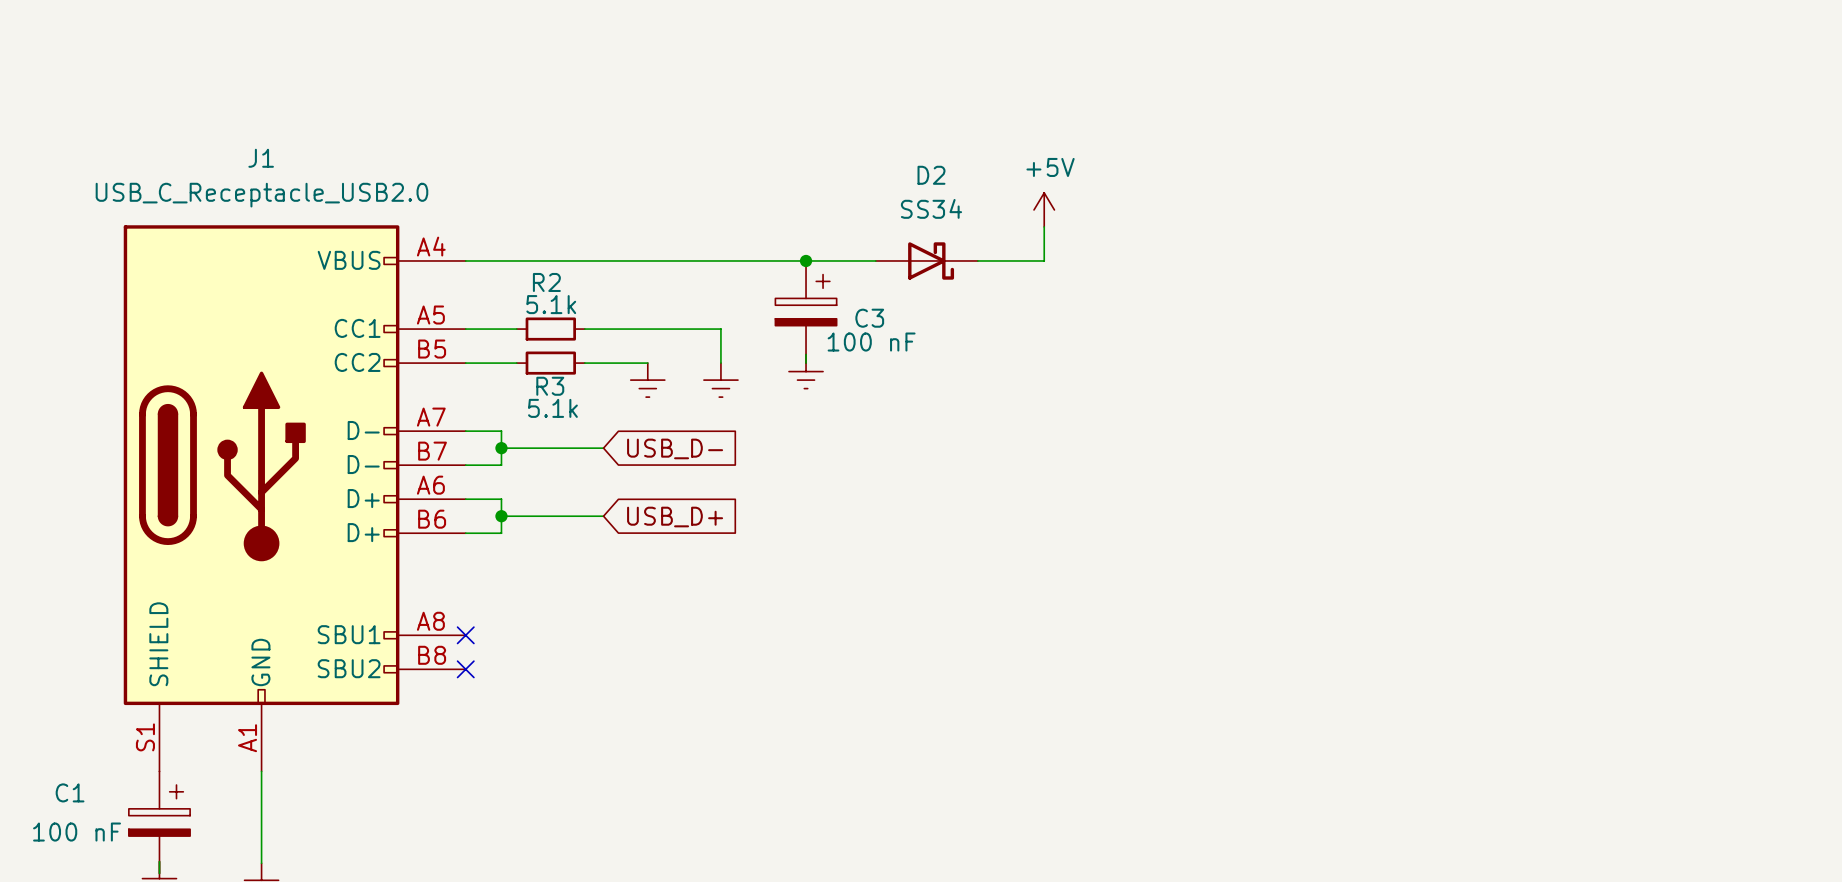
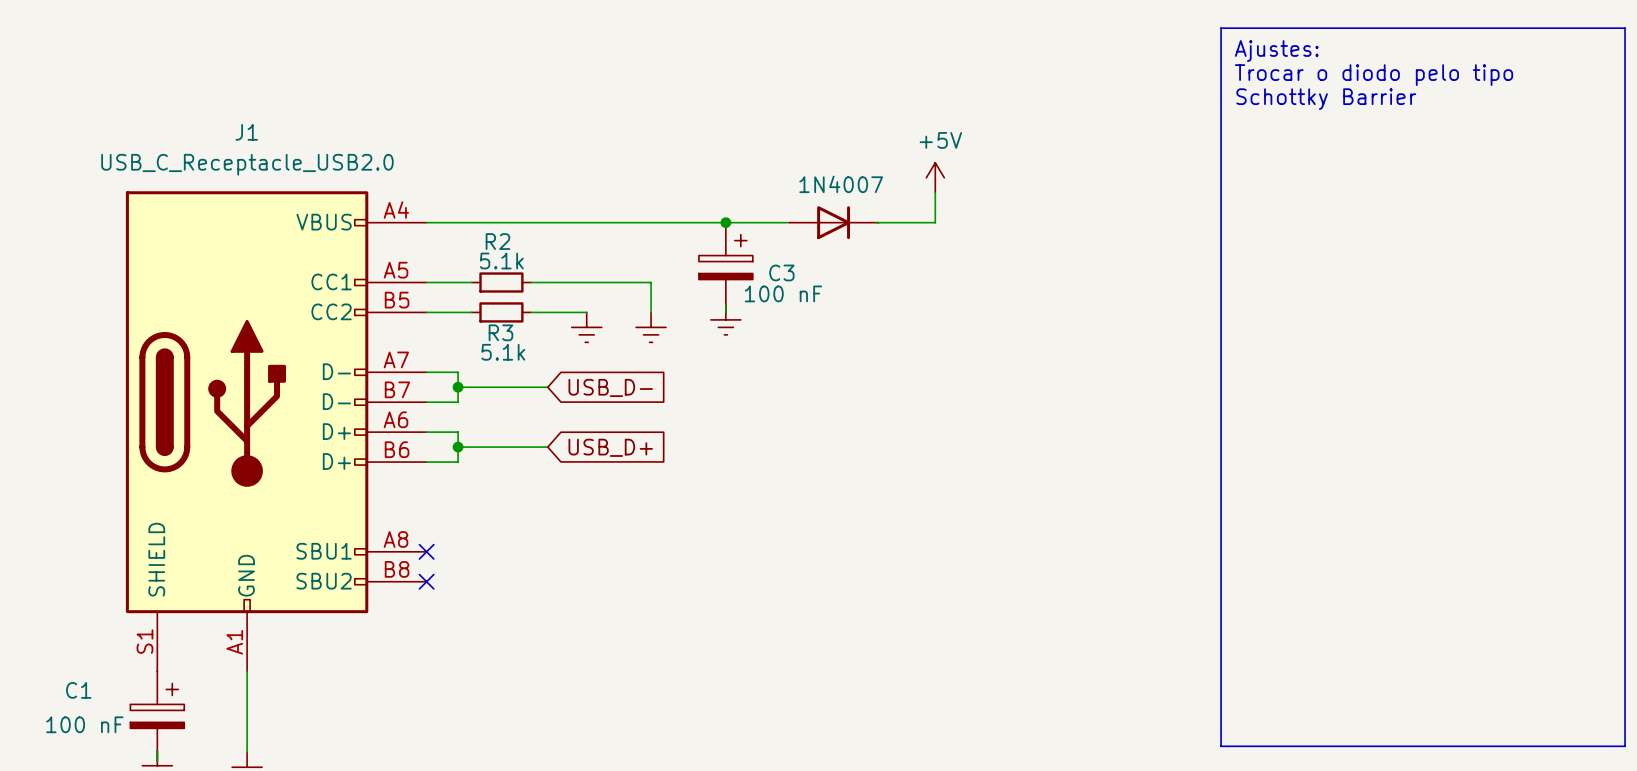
line: none -> (1221, 28) (1625, 28) (1625, 746) (1221, 746) (1221, 28)
text: none -> Ajustes: (1276, 50)
text: none -> Trocar o diodo pelo tipo (1374, 75)
text: none -> Schottky Barrier (1326, 99)
D2: SS34 (926, 260) -> none
part: none -> 1N4007 (833, 222)

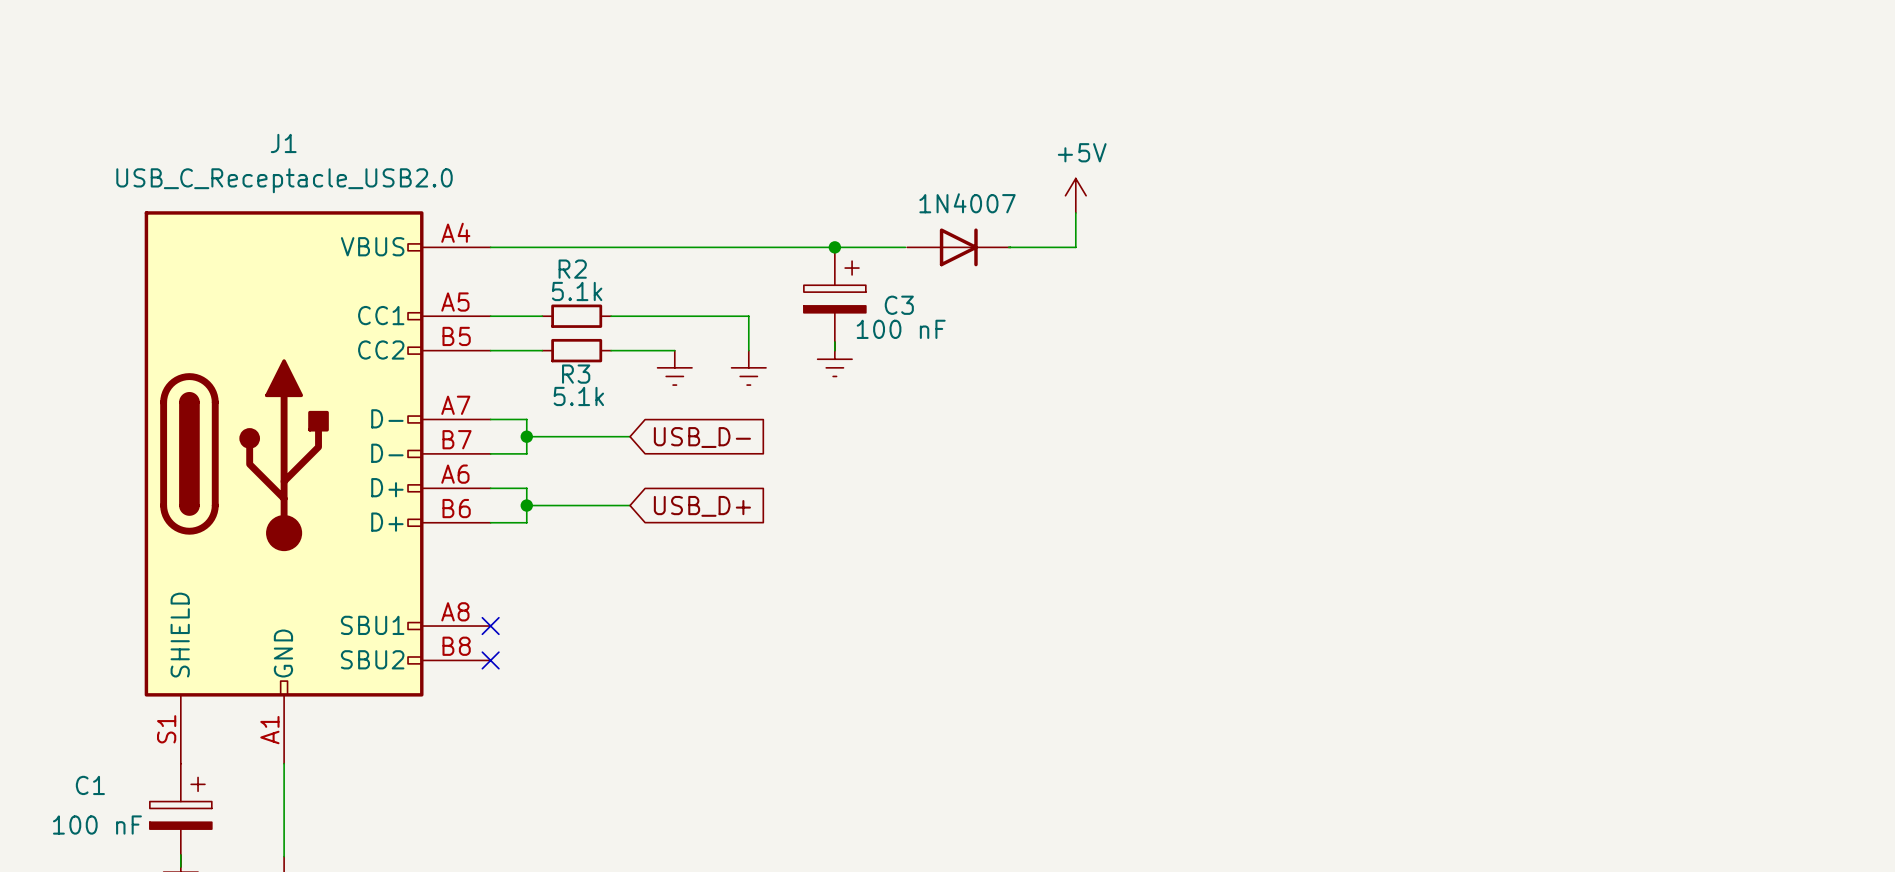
line: (1221, 28) (1625, 28) (1625, 746) (1221, 746) (1221, 28) -> none
text: Ajustes: (1276, 50) -> none
text: Trocar o diodo pelo tipo (1374, 75) -> none
text: Schottky Barrier (1326, 99) -> none

